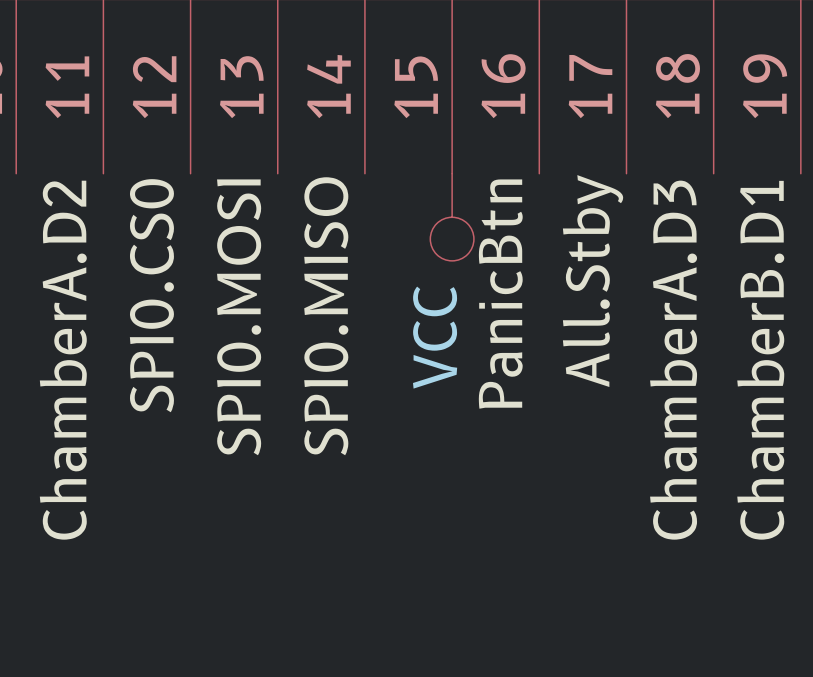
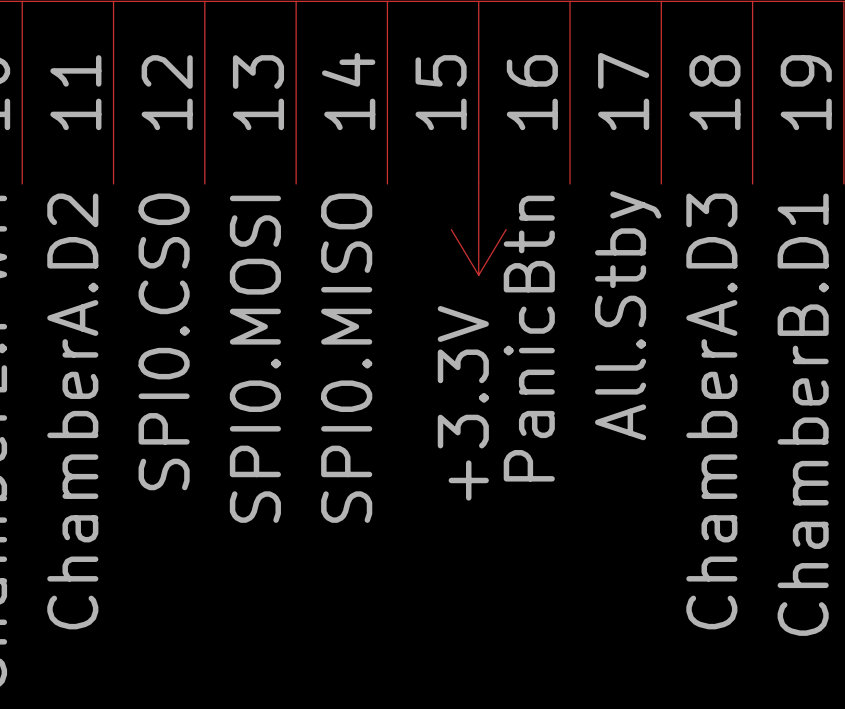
power symbol: VCC (452, 217) -> +3.3V (478, 229)

